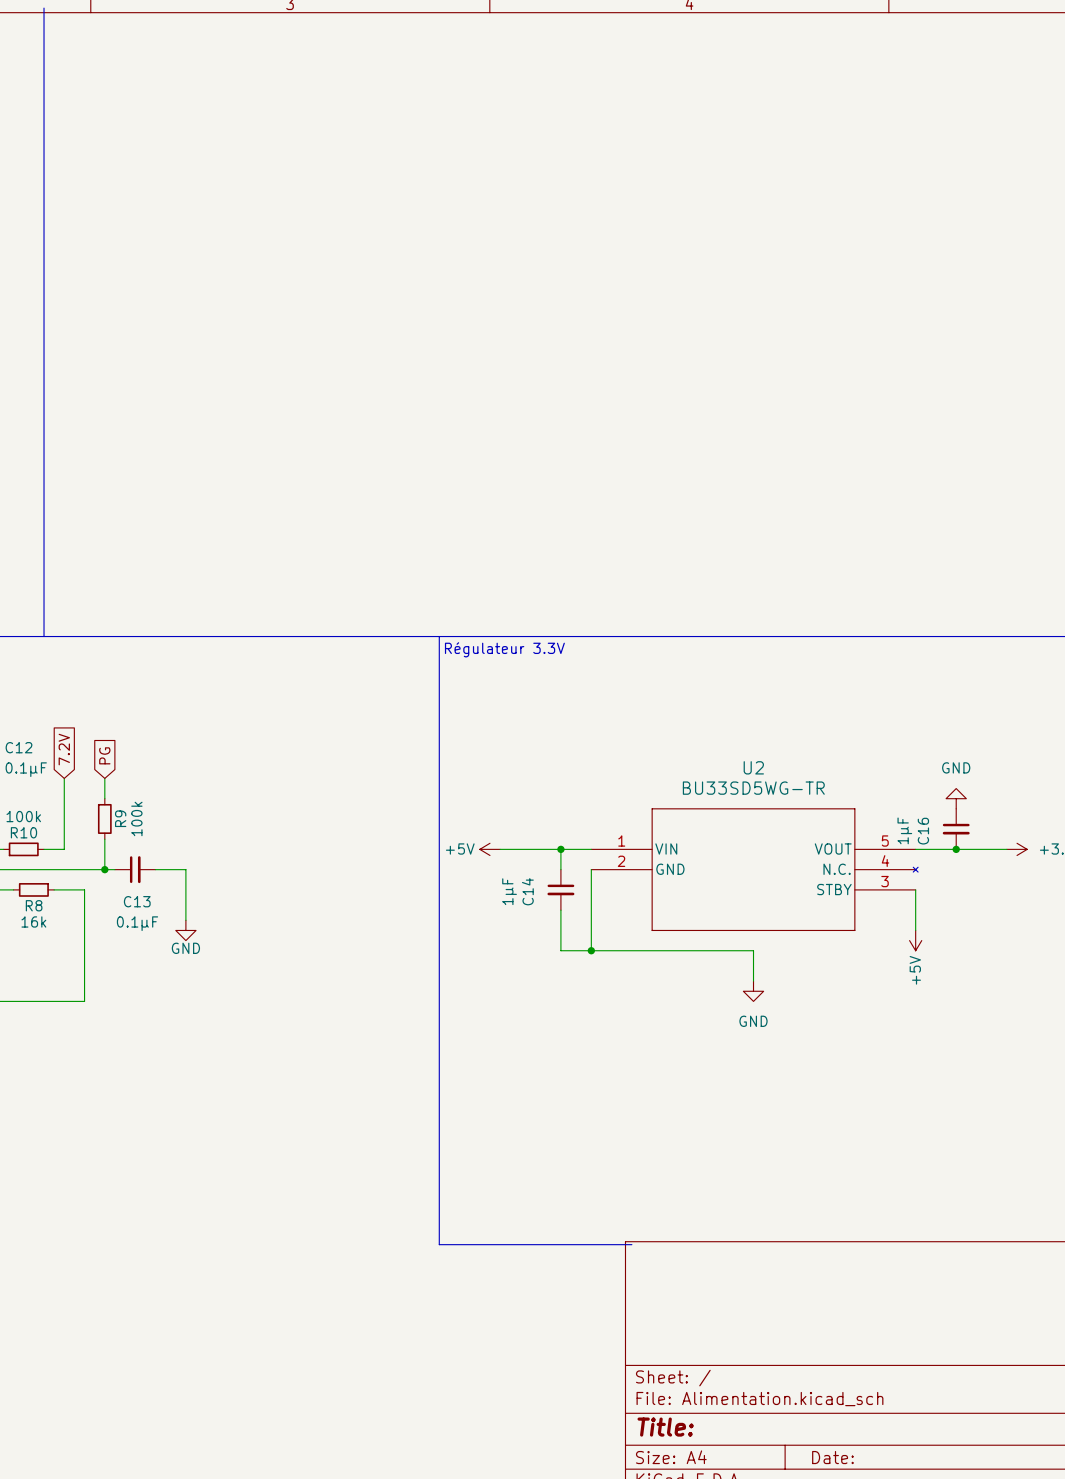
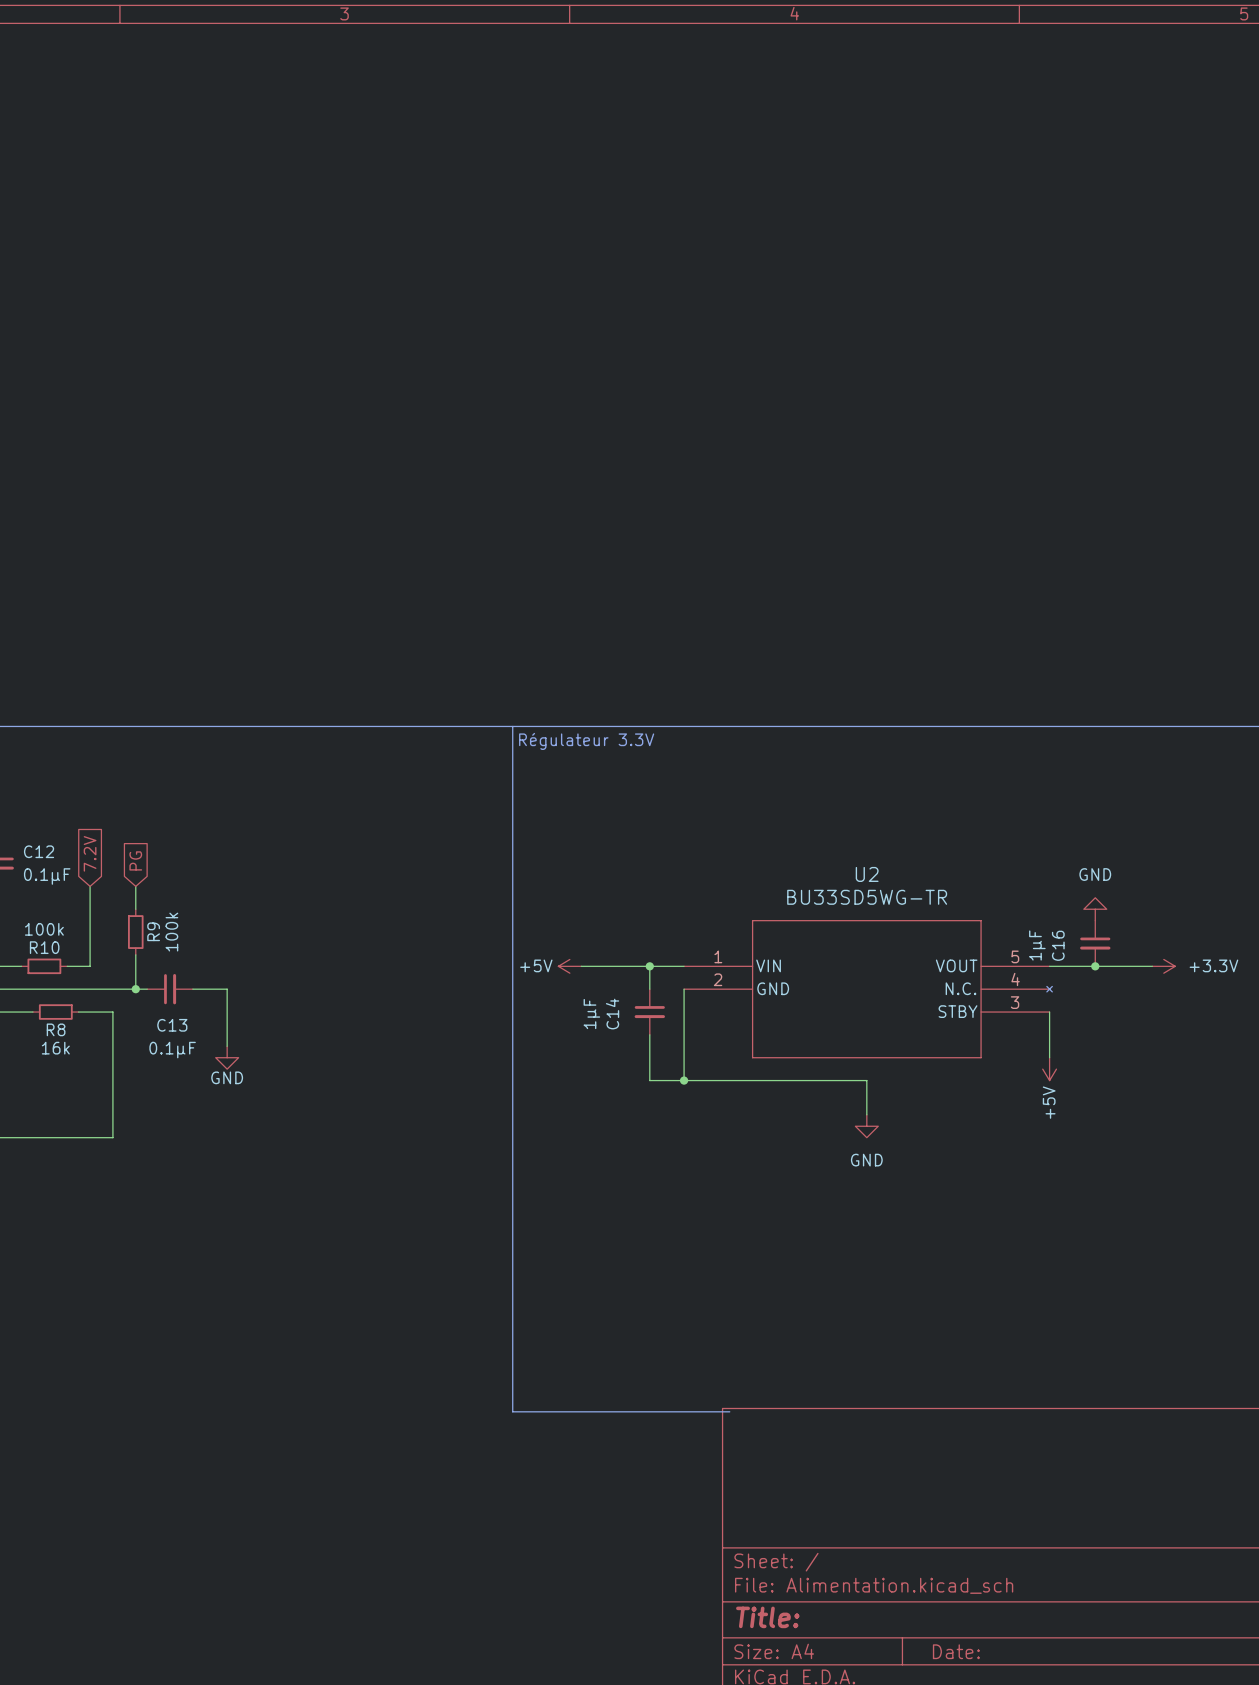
line: (44, 8) (44, 636) -> none

